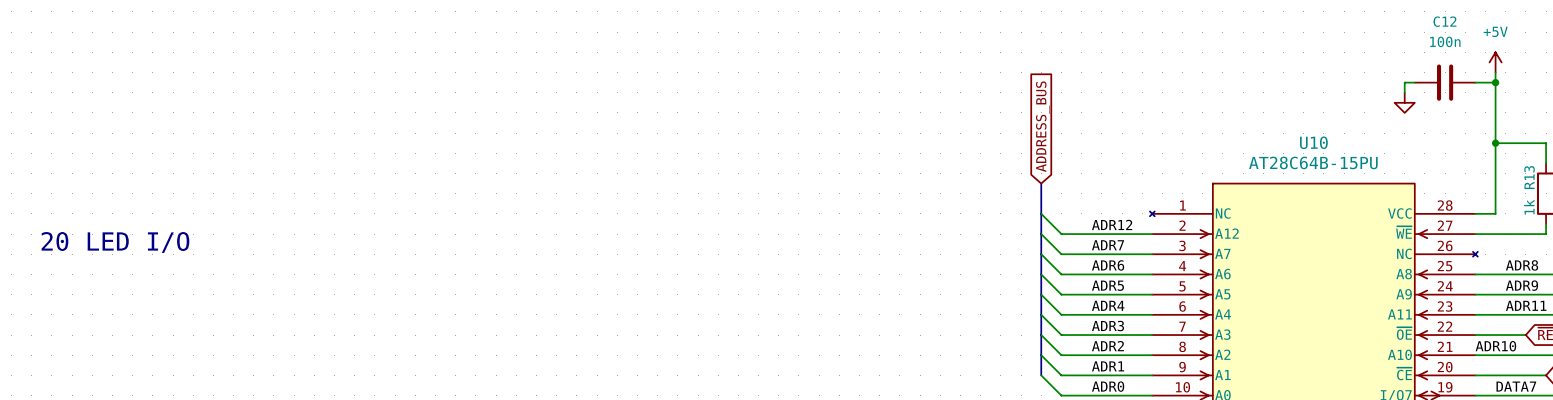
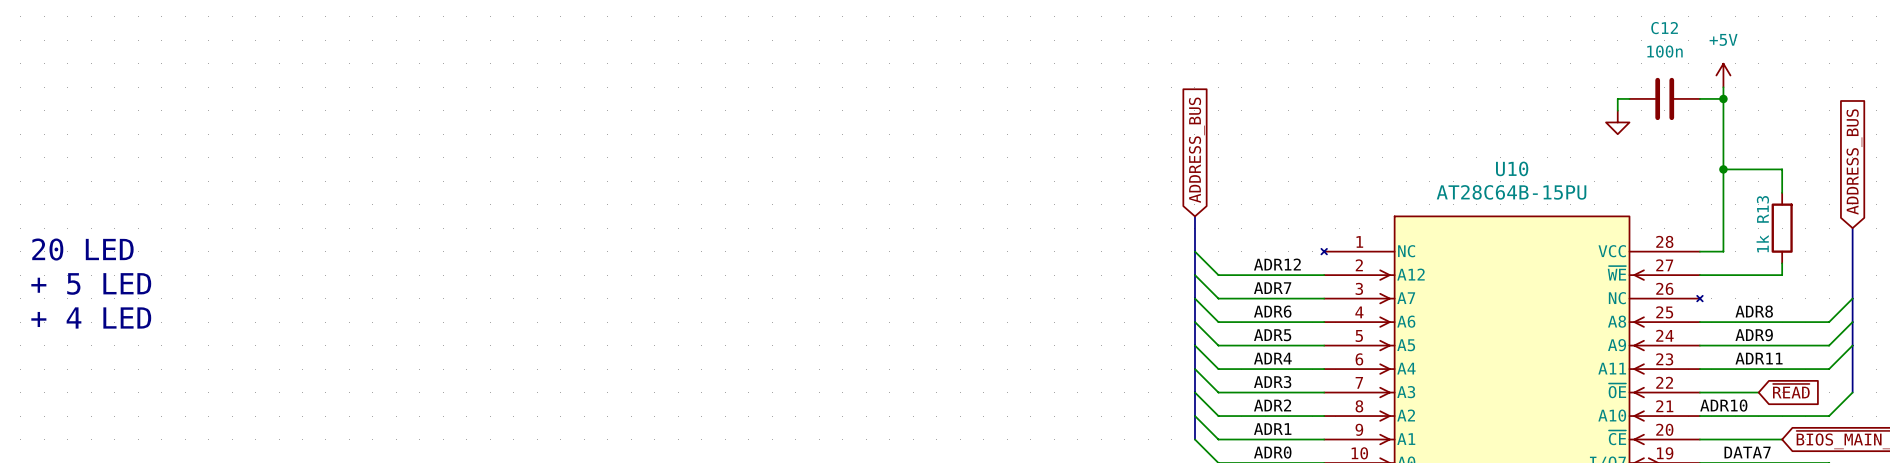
text: none -> 20 LED (82, 249)
text: 20 LED I/O (115, 242) -> + 5 LED (91, 283)
text: none -> + 4 LED (91, 317)

